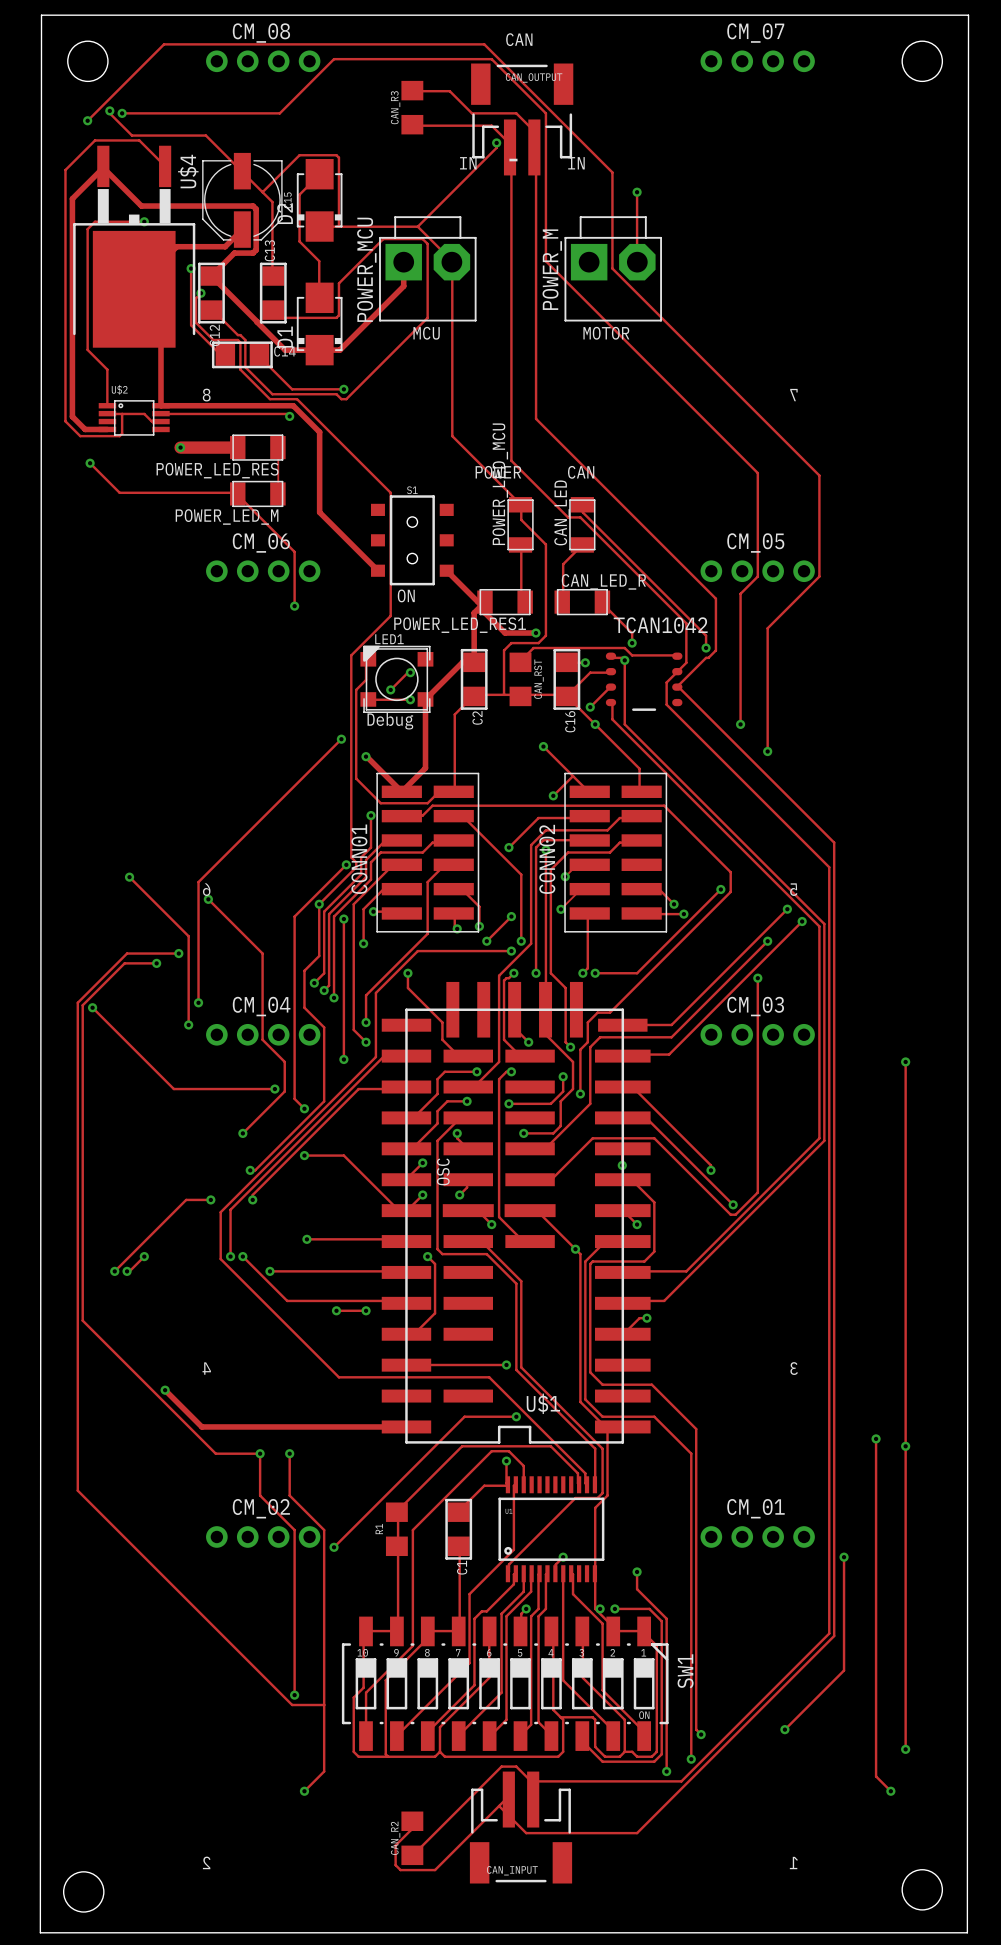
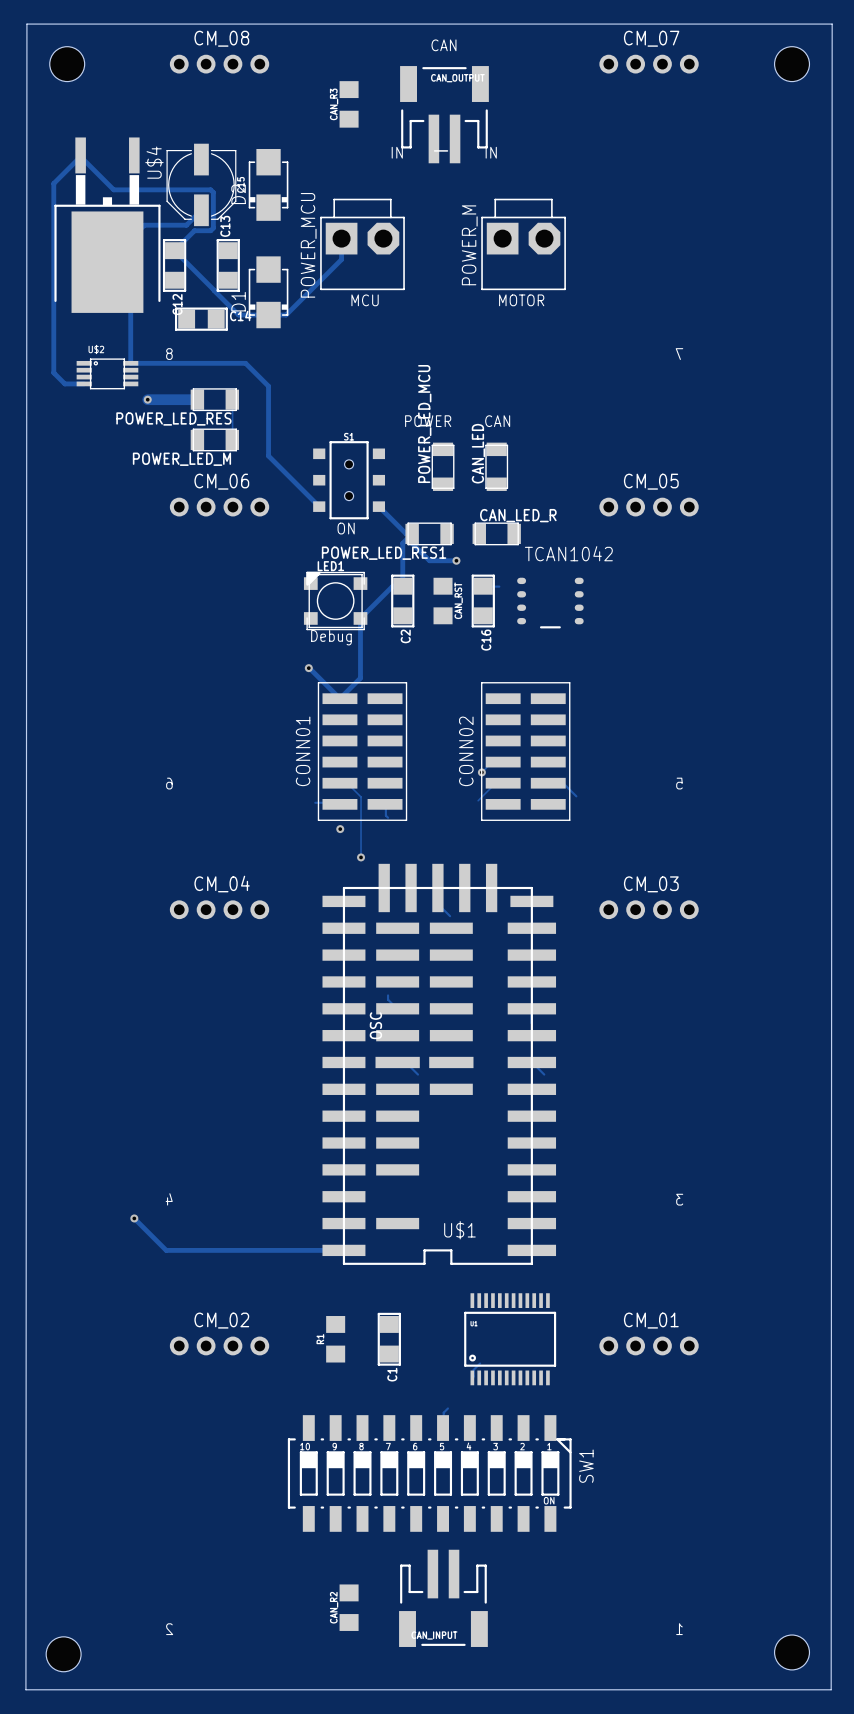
track: (412, 90) (449, 91) (472, 113) (516, 113) (533, 130) (533, 145) (536, 147) (536, 418) (715, 598) (715, 650) (677, 687) (834, 842) (834, 1636) (637, 1833) (526, 1833) (499, 1806) -> none
track: (109, 110) (109, 113) (132, 135) (205, 135) (242, 171) (272, 202) (273, 276) -> none
via: (109, 110) -> none
track: (122, 113) (279, 113) (334, 59) (491, 59) (545, 113) (545, 261) (757, 473) (757, 576) (740, 593) (740, 724) -> none
via: (122, 113) -> none
track: (87, 120) (164, 44) (484, 44) (612, 172) (612, 268) (819, 475) (819, 576) (767, 628) (767, 751) -> none
via: (87, 120) -> none
track: (412, 124) (491, 125) (511, 145) (511, 460) (568, 517) (580, 517) (686, 623) (686, 662) (666, 682) (666, 704) (829, 867) (829, 1633) (681, 1781) (531, 1781) -> none
track: (496, 142) (496, 147) (417, 226) -> none
via: (496, 142) -> none
track: (165, 166) (139, 140) (95, 140) (65, 170) (65, 421) (80, 436) (119, 436) (122, 433) (122, 413) -> none
track: (319, 174) (299, 194) (299, 241) (319, 261) (319, 297) -> none
track: (262, 192) (299, 155) (336, 155) (338, 157) (338, 226) -> none
track: (637, 192) (637, 262) -> none
via: (637, 192) -> none
track: (144, 221) (95, 221) (87, 229) (87, 349) (107, 369) (107, 405) -> none
via: (144, 221) -> none
track: (319, 226) (417, 226) -> none
track: (417, 226) (452, 261) (452, 436) (521, 505) (521, 519) (545, 544) (545, 635) (538, 643) (511, 643) (504, 650) (504, 694) -> none
track: (191, 268) (191, 325) (223, 357) (225, 354) -> none
via: (191, 268) -> none
track: (200, 293) (196, 298) (196, 322) (213, 340) (237, 340) (240, 342) (240, 369) (269, 399) (297, 399) (390, 492) (390, 615) (351, 655) (351, 857) (356, 862) (356, 867) (319, 904) (319, 956) (304, 970) (304, 1007) (324, 1027) (324, 1101) (255, 1170) (250, 1170) -> none
via: (200, 293) -> none
track: (211, 310) (245, 340) (245, 367) (272, 394) (336, 394) (341, 399) (346, 399) (427, 317) (427, 243) (422, 239) (383, 239) (338, 283) (338, 315) (336, 317) (282, 317) (273, 310) -> none
track: (259, 354) (292, 389) (343, 389) -> none
via: (343, 389) -> none
track: (107, 413) (144, 413) (151, 421) (160, 421) -> none
track: (160, 413) (287, 413) (289, 416) -> none
via: (289, 416) -> none
track: (90, 463) (119, 492) (237, 493) (294, 551) (294, 606) -> none
via: (90, 463) -> none
track: (582, 504) (582, 512) (706, 635) (706, 648) -> none
track: (520, 544) (521, 598) (525, 602) -> none
track: (582, 544) (563, 564) (562, 602) -> none
track: (602, 602) (632, 633) (632, 643) -> none
via: (294, 606) -> none
via: (632, 643) -> none
via: (706, 648) -> none
track: (610, 656) (622, 657) (624, 660) (624, 724) (824, 923) (824, 1140) (664, 1300) (624, 1300) (622, 1303) -> none
track: (677, 656) (632, 655) (624, 648) (533, 648) (520, 662) -> none
track: (368, 659) (366, 660) (366, 680) (356, 689) (356, 778) (380, 803) (427, 803) (437, 793) (452, 793) (454, 790) (454, 714) (474, 694) (518, 694) (520, 696) (521, 694) (565, 694) (566, 696) -> none
via: (624, 660) -> none
via: (585, 662) -> none
track: (610, 671) (590, 672) (566, 696) -> none
track: (410, 672) (407, 672) (390, 689) -> none
via: (410, 672) -> none
track: (610, 687) (590, 707) -> none
via: (390, 689) -> none
track: (566, 696) (639, 768) (639, 790) (641, 791) -> none
track: (368, 699) (410, 699) -> none
via: (410, 699) -> none
track: (610, 702) (612, 719) (819, 926) (819, 1138) (686, 1271) (622, 1272) -> none
via: (590, 707) -> none
via: (595, 724) -> none
via: (740, 724) -> none
track: (341, 739) (198, 882) (198, 1002) -> none
via: (341, 739) -> none
track: (543, 746) (589, 791) -> none
via: (543, 746) -> none
via: (767, 751) -> none
track: (573, 776) (553, 795) -> none
via: (553, 795) -> none
track: (370, 815) (370, 847) (361, 857) (361, 874) (324, 911) (324, 973) (314, 983) -> none
via: (370, 815) -> none
track: (401, 816) (422, 815) (432, 805) (664, 805) (730, 872) (730, 891) (609, 1012) (597, 1012) (587, 1022) (587, 1042) (580, 1049) (580, 1093) -> none
track: (453, 816) (454, 818) (464, 818) (521, 874) (521, 941) -> none
track: (589, 816) (587, 818) (538, 818) (508, 847) -> none
track: (641, 816) (639, 818) (619, 818) (607, 830) (545, 830) (531, 845) (531, 943) (499, 975) (499, 1061) (474, 1086) (468, 1087) -> none
track: (401, 840) (400, 842) (383, 842) (366, 859) (366, 877) (329, 914) (329, 985) (324, 990) -> none
track: (453, 840) (452, 842) (432, 842) (422, 852) (380, 852) (370, 862) (370, 879) (334, 916) (334, 997) -> none
track: (589, 840) (543, 840) (536, 847) (536, 973) -> none
track: (641, 840) (639, 842) (619, 842) (609, 852) (568, 852) (550, 869) (550, 973) (565, 988) (565, 1042) (570, 1047) -> none
via: (508, 847) -> none
track: (545, 850) (545, 1034) (573, 1061) (573, 1089) (560, 1101) (560, 1126) (553, 1133) (523, 1133) -> none
via: (545, 850) -> none
track: (346, 864) (294, 916) (294, 1098) (304, 1108) -> none
via: (346, 864) -> none
track: (401, 864) (393, 864) (353, 904) (353, 1029) (366, 1042) -> none
track: (453, 864) (444, 864) (427, 882) (427, 933) (366, 995) (366, 1022) -> none
track: (129, 877) (188, 936) (188, 1024) -> none
via: (129, 877) -> none
track: (401, 889) (383, 889) (363, 909) (363, 943) -> (339, 783) (347, 783) (361, 797) (361, 857)
track: (453, 889) (462, 889) (479, 906) (479, 926) -> none
track: (720, 889) (637, 973) (595, 973) -> none
via: (720, 889) -> none
track: (208, 899) (262, 953) (262, 1039) (284, 1061) (284, 1091) (242, 1133) -> none
via: (208, 899) -> none
via: (319, 904) -> none
via: (674, 904) -> none
via: (560, 909) -> none
track: (787, 909) (671, 1024) (622, 1025) -> none
via: (787, 909) -> none
via: (373, 911) -> none
track: (589, 913) (587, 914) (587, 968) (582, 973) -> none
track: (641, 913) (683, 914) -> none
via: (683, 914) -> none
track: (511, 916) (486, 941) -> none
via: (511, 916) -> none
track: (343, 919) (343, 1059) -> none
via: (343, 919) -> none
track: (802, 921) (669, 1054) (622, 1056) -> none
via: (802, 921) -> none
via: (479, 926) -> none
via: (457, 928) -> none
via: none -> (340, 829)
via: (486, 941) -> none
via: (521, 941) -> none
track: (767, 941) (671, 1037) (600, 1037) (590, 1047) (590, 1103) (545, 1148) (530, 1148) -> none
via: (767, 941) -> none
via: (363, 943) -> none
track: (511, 951) (417, 951) (375, 992) (375, 1057) (220, 1212) (220, 1259) (338, 1377) (489, 1377) (585, 1473) (587, 1484) -> none
via: (511, 951) -> none
track: (178, 953) (127, 953) (77, 1002) (77, 1490) (292, 1705) (324, 1705) -> none
via: (178, 953) -> none
track: (156, 963) (124, 963) (82, 1005) (82, 1320) (215, 1453) (260, 1453) (260, 1495) (294, 1530) (294, 1695) -> none
via: (156, 963) -> none
track: (407, 973) (407, 988) (442, 1022) (442, 1039) (457, 1054) (468, 1056) -> none
via: (407, 973) -> none
track: (513, 973) (504, 980) (504, 1039) (518, 1054) (530, 1056) -> none
via: (513, 973) -> none
via: (536, 973) -> none
via: (582, 973) -> none
via: (595, 973) -> none
via: none -> (361, 857)
track: (757, 978) (757, 1192) (735, 1214) (730, 1214) (654, 1138) (592, 1138) (553, 1177) (531, 1177) (530, 1179) -> none
via: (757, 978) -> none
via: (314, 983) -> none
via: (324, 990) -> none
via: (334, 997) -> none
via: (198, 1002) -> none
track: (92, 1007) (173, 1089) (274, 1089) -> none
via: (92, 1007) -> none
via: (366, 1022) -> none
via: (188, 1024) -> none
via: (366, 1042) -> none
via: (528, 1042) -> none
via: (570, 1047) -> none
track: (406, 1056) (383, 1057) (230, 1209) (230, 1256) -> none
via: (343, 1059) -> none
track: (905, 1061) (905, 1749) -> none
via: (905, 1061) -> none
track: (476, 1071) (444, 1071) (437, 1079) (437, 1093) (415, 1116) (406, 1117) -> none
via: (476, 1071) -> none
track: (511, 1071) (506, 1071) (499, 1079) (499, 1217) (521, 1239) (528, 1239) (530, 1241) -> none
via: (511, 1071) -> none
track: (563, 1076) (563, 1091) (550, 1103) (508, 1103) -> none
via: (563, 1076) -> none
track: (406, 1087) (405, 1089) (358, 1089) (252, 1194) (252, 1199) -> none
track: (622, 1087) (624, 1089) (634, 1089) (711, 1165) (711, 1170) -> none
via: (274, 1089) -> none
via: (580, 1093) -> none
track: (467, 1101) (447, 1101) (437, 1111) (437, 1123) (412, 1148) (406, 1148) -> none
via: (467, 1101) -> none
via: (508, 1103) -> none
via: (304, 1108) -> none
track: (468, 1117) (459, 1118) (437, 1140) (437, 1249) (442, 1254) (486, 1254) (516, 1283) (516, 1369) (595, 1448) (594, 1484) -> none
track: (622, 1117) (646, 1118) (733, 1204) -> none
via: (242, 1133) -> none
via: (457, 1133) -> none
via: (523, 1133) -> none
track: (304, 1155) (343, 1155) (398, 1209) (407, 1209) (422, 1194) -> none
via: (304, 1155) -> none
track: (422, 1162) (406, 1179) -> none
via: (422, 1162) -> none
via: (622, 1165) -> none
via: (250, 1170) -> none
via: (711, 1170) -> none
track: (468, 1179) (467, 1187) (459, 1194) -> none
track: (622, 1179) (632, 1180) (654, 1202) (654, 1251) (644, 1261) (592, 1261) (590, 1263) (590, 1372) (602, 1384) (651, 1384) (696, 1429) (696, 1729) (701, 1734) -> none
via: (422, 1194) -> none
via: (459, 1194) -> none
track: (210, 1199) (186, 1199) (114, 1271) -> none
via: (210, 1199) -> none
via: (252, 1199) -> none
via: (733, 1204) -> none
track: (530, 1210) (538, 1212) (580, 1254) (580, 1401) (605, 1426) (622, 1426) (622, 1426) (607, 1426) (607, 1495) (595, 1507) (595, 1608) (612, 1626) (612, 1631) (644, 1631) (656, 1645) (656, 1751) (651, 1756) (637, 1756) (632, 1751) (624, 1751) -> none
via: (491, 1224) -> none
via: (637, 1224) -> none
track: (306, 1239) (405, 1239) (406, 1241) -> none
via: (306, 1239) -> none
track: (468, 1241) (481, 1241) (521, 1281) (521, 1367) (602, 1448) (602, 1493) (597, 1498) (575, 1498) (508, 1564) (507, 1573) -> none
track: (622, 1241) (605, 1241) (585, 1261) (585, 1399) (602, 1416) (654, 1416) (691, 1453) (691, 1759) -> none
via: (575, 1249) -> none
track: (144, 1256) (129, 1271) (127, 1271) -> none
via: (144, 1256) -> none
via: (230, 1256) -> none
track: (242, 1256) (287, 1300) (405, 1300) (406, 1303) -> none
via: (242, 1256) -> none
track: (427, 1256) (435, 1263) (435, 1313) (415, 1332) (406, 1334) -> none
via: (427, 1256) -> none
via: (114, 1271) -> none
via: (127, 1271) -> none
track: (269, 1271) (406, 1272) -> none
via: (269, 1271) -> none
track: (336, 1310) (366, 1310) -> none
via: (336, 1310) -> none
via: (366, 1310) -> none
track: (646, 1318) (639, 1318) (622, 1334) -> none
via: (646, 1318) -> none
track: (506, 1364) (406, 1365) -> none
via: (506, 1364) -> none
track: (516, 1416) (464, 1416) (334, 1547) -> none
via: (516, 1416) -> none
track: (876, 1438) (876, 1776) (890, 1791) -> none
via: (876, 1438) -> none
via: (905, 1446) -> none
via: (260, 1453) -> none
track: (289, 1453) (289, 1495) (324, 1530) (324, 1771) (304, 1791) -> none
via: (289, 1453) -> none
track: (506, 1461) (507, 1484) (484, 1485) (458, 1512) -> none
via: (506, 1461) -> none
track: (515, 1484) (513, 1485) (513, 1549) (469, 1594) (469, 1663) (396, 1736) -> none
track: (523, 1484) (523, 1466) (508, 1451) (491, 1451) (412, 1530) (412, 1645) (366, 1692) (366, 1736) -> none
track: (579, 1484) (577, 1473) (550, 1446) (462, 1446) (396, 1512) (398, 1631) (366, 1631) (363, 1633) (363, 1687) (353, 1697) (353, 1751) (358, 1756) (435, 1756) (439, 1751) -> none
part position: (551, 1529) -> (510, 1339)
track: (458, 1546) (459, 1631) (427, 1631) (427, 1638) (385, 1680) (385, 1754) (388, 1756) -> none
via: (334, 1547) -> none
via: (563, 1557) -> none
track: (844, 1557) (844, 1670) (784, 1729) -> none
via: (844, 1557) -> none
track: (637, 1571) (637, 1589) (666, 1618) (666, 1771) -> none
via: (637, 1571) -> none
track: (515, 1573) (513, 1574) (513, 1584) (486, 1611) (481, 1611) (474, 1618) (474, 1685) (430, 1729) (430, 1734) (427, 1736) -> none
track: (523, 1573) (523, 1591) (501, 1613) (501, 1692) (458, 1736) -> none
track: (531, 1573) (531, 1591) (506, 1616) (506, 1719) (489, 1736) -> none
track: (539, 1573) (538, 1608) (531, 1616) (531, 1724) (520, 1736) -> none
track: (547, 1573) (545, 1574) (545, 1608) (538, 1616) (538, 1722) (551, 1736) -> none
track: (563, 1573) (563, 1680) (612, 1729) (613, 1736) -> none
track: (571, 1573) (573, 1574) (573, 1594) (602, 1623) (602, 1690) (642, 1729) (642, 1734) (644, 1736) -> none
via: (526, 1608) -> none
via: (600, 1608) -> none
track: (614, 1608) (649, 1608) (661, 1621) (661, 1754) (654, 1761) (602, 1761) (582, 1741) (582, 1736) -> none
via: (614, 1608) -> none
track: (489, 1631) (489, 1677) (439, 1727) (439, 1751) -> none
track: (551, 1631) (553, 1633) (553, 1709) (563, 1719) (563, 1751) (558, 1756) (444, 1756) (439, 1751) -> none
track: (582, 1631) (582, 1677) (624, 1719) (624, 1751) -> none
via: (294, 1695) -> none
track: (560, 1717) (592, 1717) (595, 1719) (595, 1746) (605, 1756) (619, 1756) (624, 1751) -> none
via: (784, 1729) -> none
via: (701, 1734) -> none
via: (905, 1749) -> none
via: (691, 1759) -> none
via: (666, 1771) -> none
track: (531, 1781) (516, 1766) (501, 1766) (412, 1855) -> none
via: (304, 1791) -> none
via: (890, 1791) -> none
track: (508, 1799) (506, 1798) (435, 1870) (400, 1870) (395, 1865) (395, 1845) (410, 1830) (412, 1821) -> none

